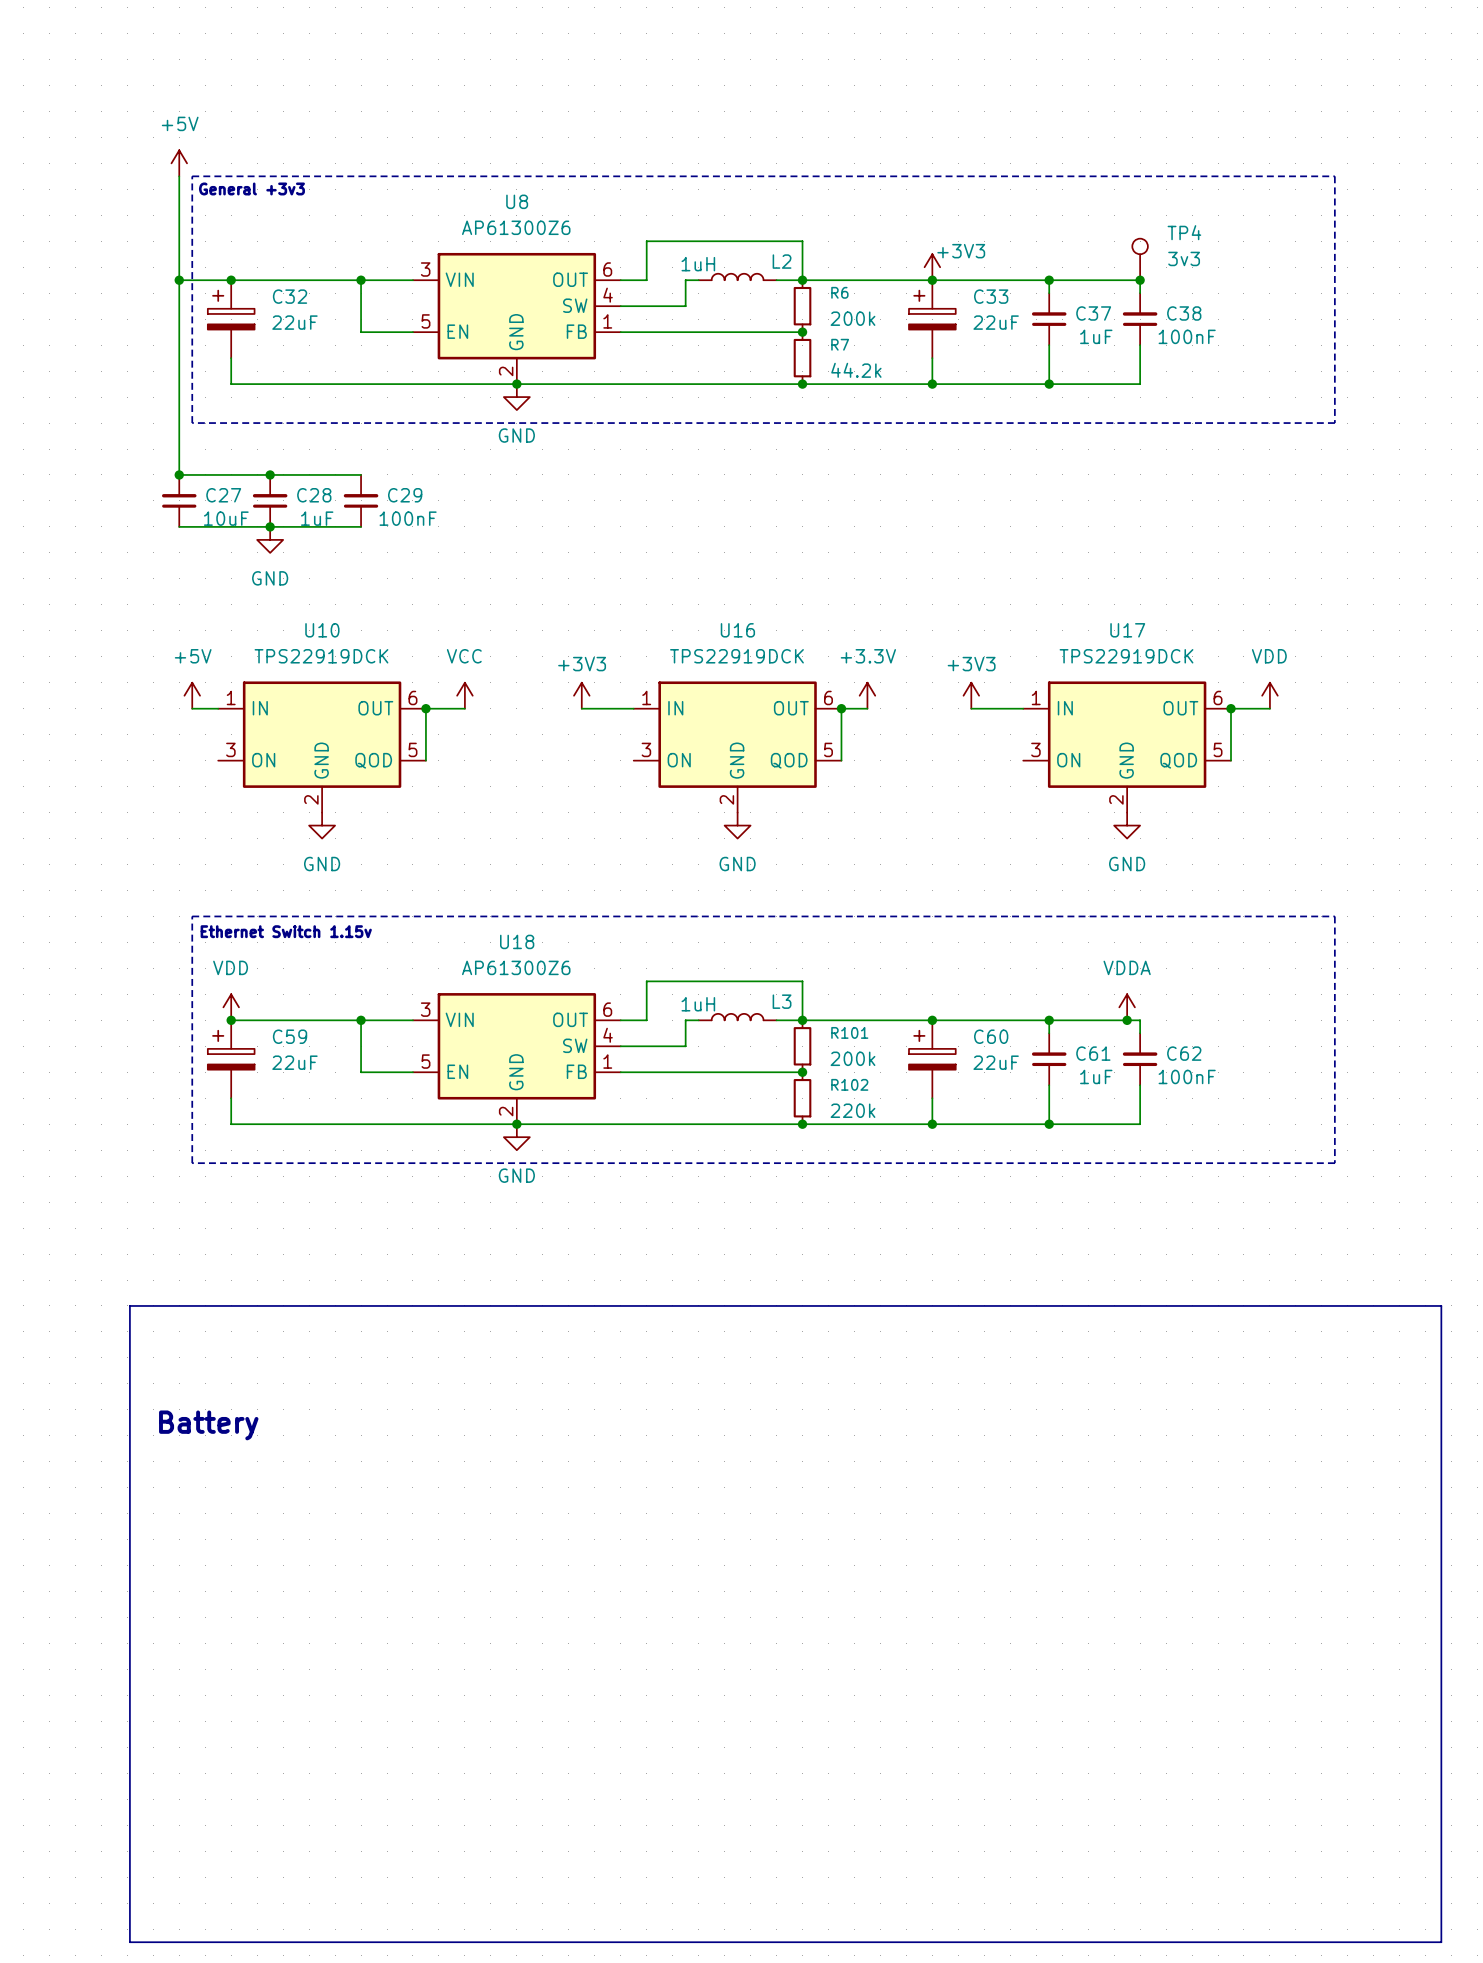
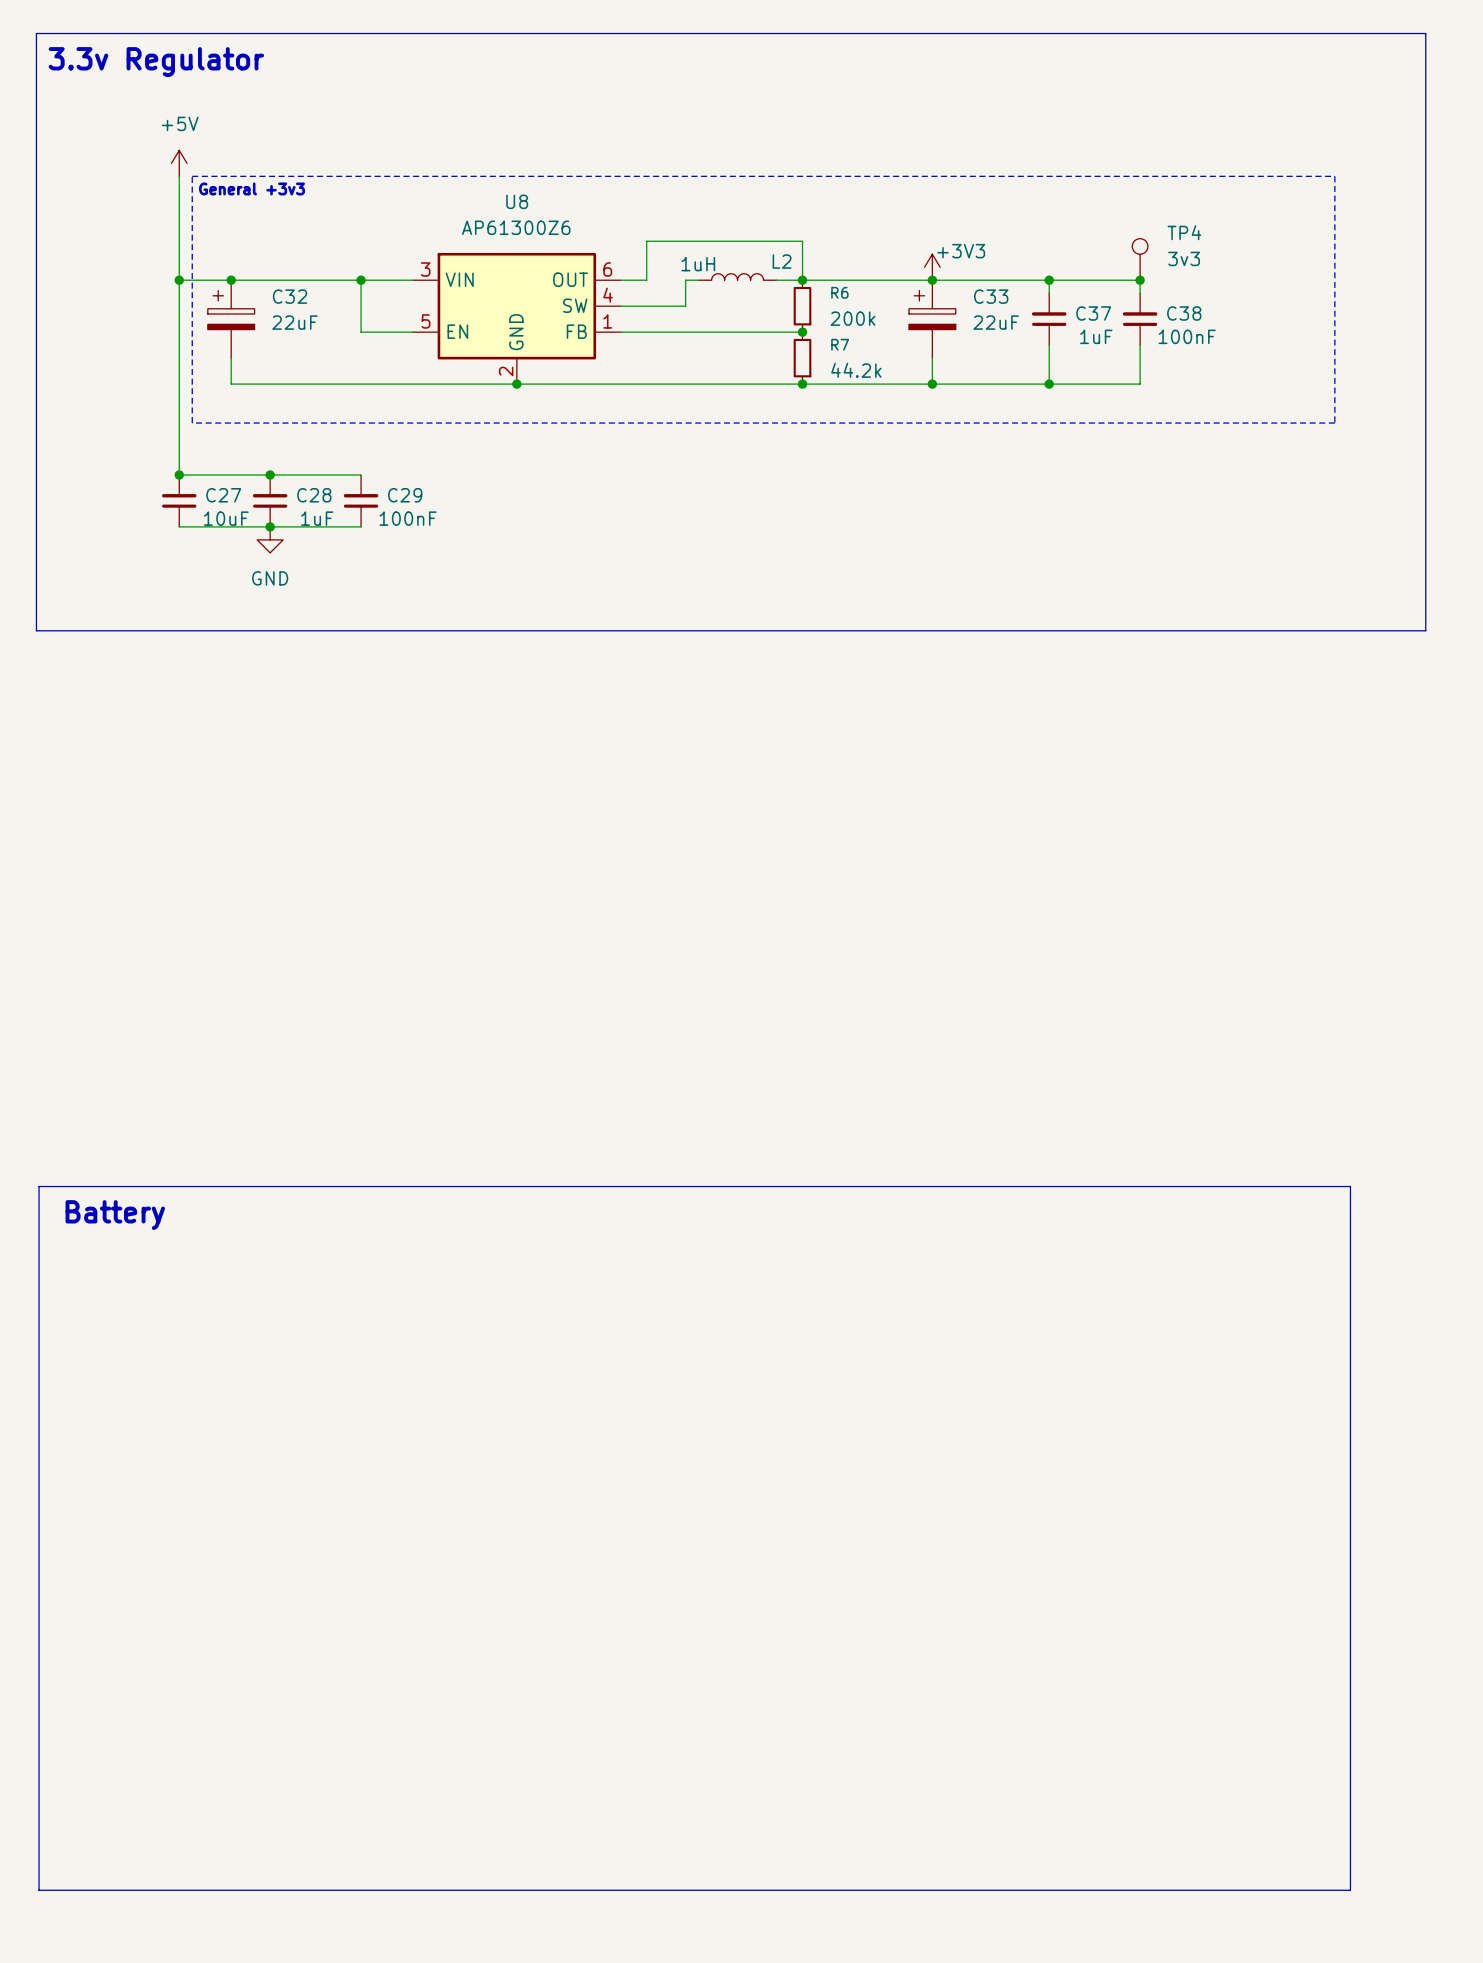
line: none -> (36, 33) (1425, 33) (1425, 630) (36, 630) (36, 33)
text: none -> 3.3v Regulator (156, 62)
power symbol: GND (516, 397) -> none
power symbol: +5V (192, 695) -> none
power symbol: VCC (464, 695) -> none
power symbol: +3V3 (581, 695) -> none
power symbol: +3.3V (867, 695) -> none
power symbol: +3V3 (971, 695) -> none
power symbol: VDD (1269, 695) -> none
wire: (192, 708) (218, 708) -> none
junction: (425, 708) -> none
wire: (464, 708) (425, 708) (425, 760) -> none
wire: (581, 708) (633, 708) -> none
junction: (841, 708) -> none
wire: (867, 708) (841, 708) (841, 760) -> none
wire: (971, 708) (1023, 708) -> none
junction: (1231, 708) -> none
wire: (1269, 708) (1231, 708) (1231, 760) -> none
U10: TPS22919DCK (322, 747) -> none
U16: TPS22919DCK (737, 747) -> none
U17: TPS22919DCK (1127, 747) -> none
power symbol: GND (322, 825) -> none
power symbol: GND (737, 825) -> none
power symbol: GND (1127, 825) -> none
line: (192, 916) (1334, 916) (1334, 1163) (192, 1163) (192, 916) -> none
text: Ethernet Switch 1.15v (286, 931) -> none
power symbol: VDD (231, 1007) -> none
power symbol: VDDA (1127, 1007) -> none
L3: 1uH (737, 1017) -> none
wire: (231, 1020) (412, 1020) -> none
junction: (231, 1020) -> none
wire: (361, 1020) (361, 1072) (412, 1072) -> none
junction: (361, 1020) -> none
wire: (620, 1020) (646, 1020) (646, 981) (802, 981) (802, 1020) -> none
wire: (698, 1020) (685, 1020) (685, 1046) (620, 1046) -> none
wire: (776, 1020) (1140, 1020) (1140, 1033) -> none
junction: (802, 1020) -> none
junction: (932, 1020) -> none
wire: (1049, 1020) (1049, 1033) -> none
junction: (1049, 1020) -> none
junction: (1127, 1020) -> none
R101: 200k (802, 1046) -> none
U18: AP61300Z6 (516, 1058) -> none
C59: 22uF (231, 1059) -> none
C60: 22uF (932, 1059) -> none
C61: 1uF (1049, 1059) -> none
C62: 100nF (1140, 1059) -> none
wire: (620, 1072) (802, 1072) -> none
junction: (802, 1072) -> none
wire: (1049, 1085) (1049, 1124) -> none
wire: (1140, 1085) (1140, 1124) (231, 1124) (231, 1098) -> none
R102: 220k (802, 1098) -> none
wire: (932, 1098) (932, 1124) -> none
junction: (516, 1124) -> none
junction: (802, 1124) -> none
junction: (932, 1124) -> none
junction: (1049, 1124) -> none
power symbol: GND (516, 1137) -> none
line: (129, 1305) (1441, 1305) (1441, 1942) (129, 1942) (129, 1305) -> (39, 1186) (39, 1890) (1350, 1890) (1350, 1186) (39, 1186)
text position: Battery (208, 1425) -> Battery (115, 1215)

